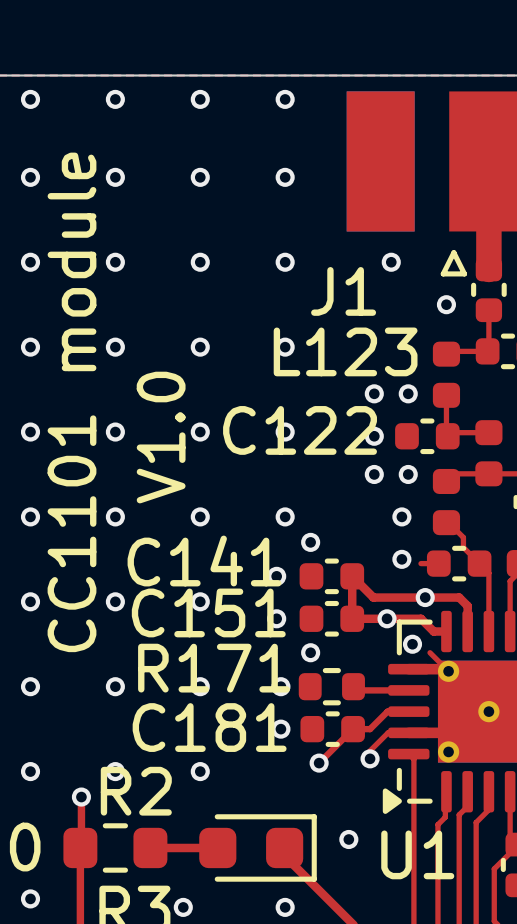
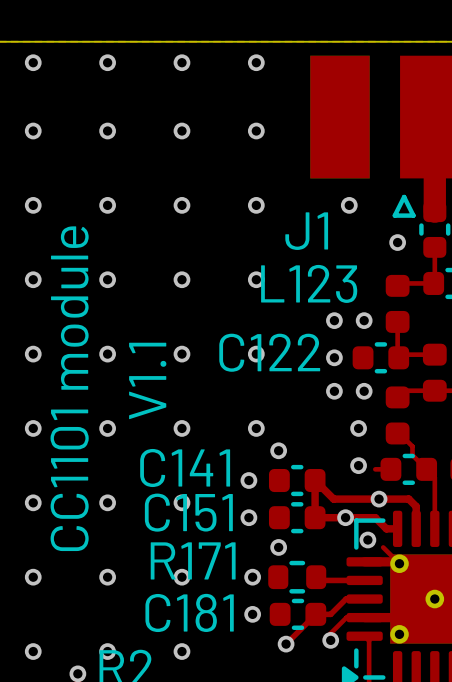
text: V1.0 (161, 437) -> V1.1 (147, 380)

